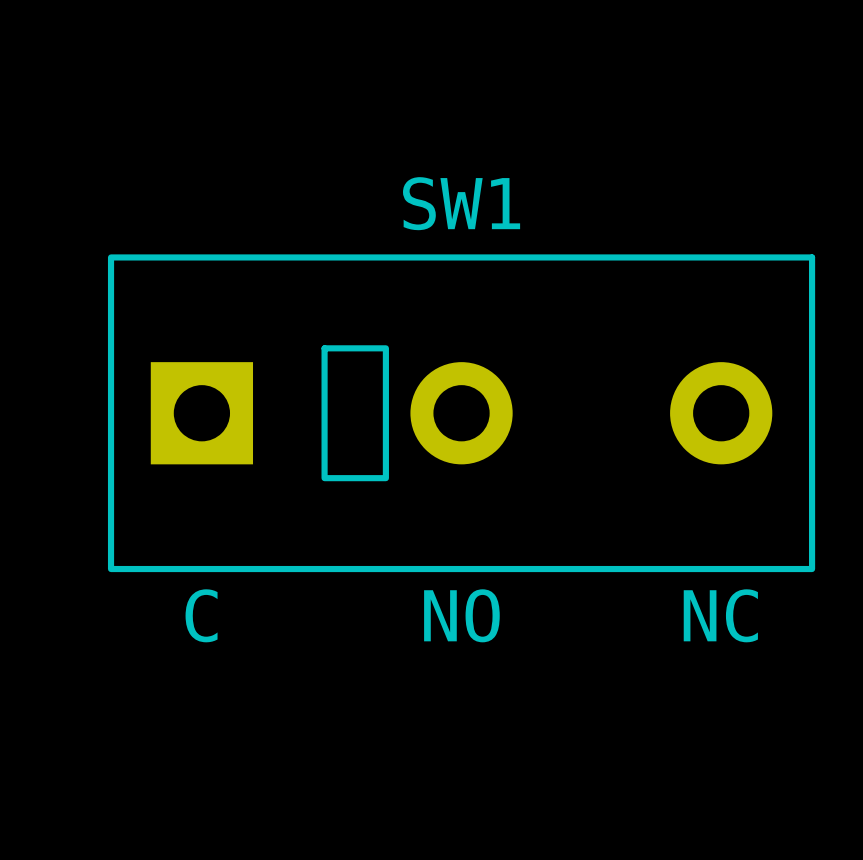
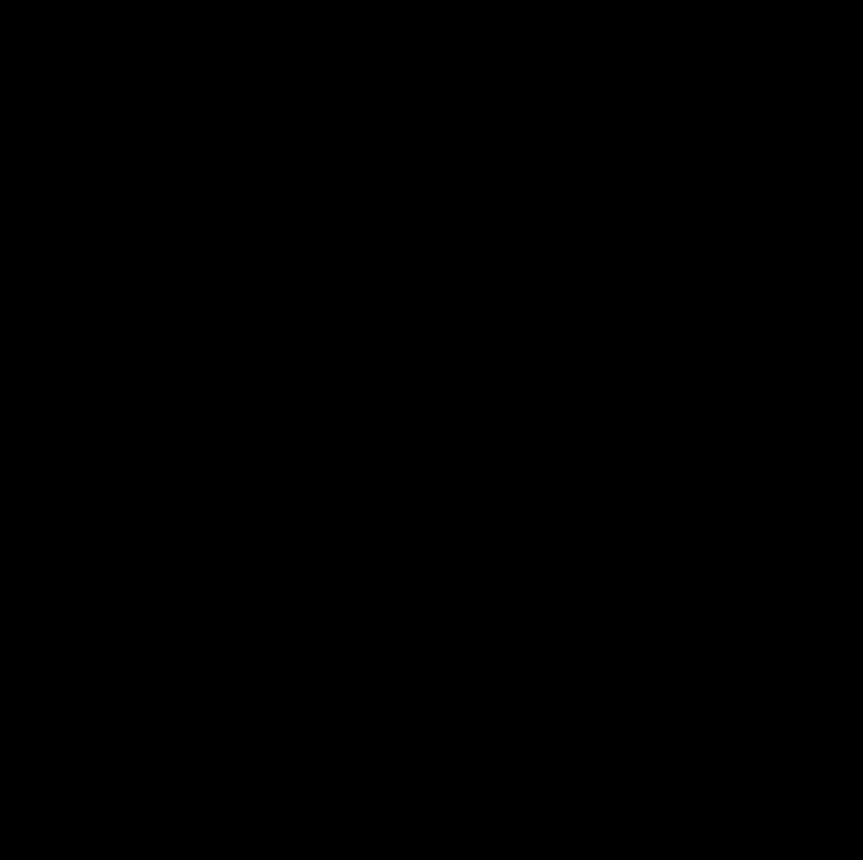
SW1: (461, 413) -> none

